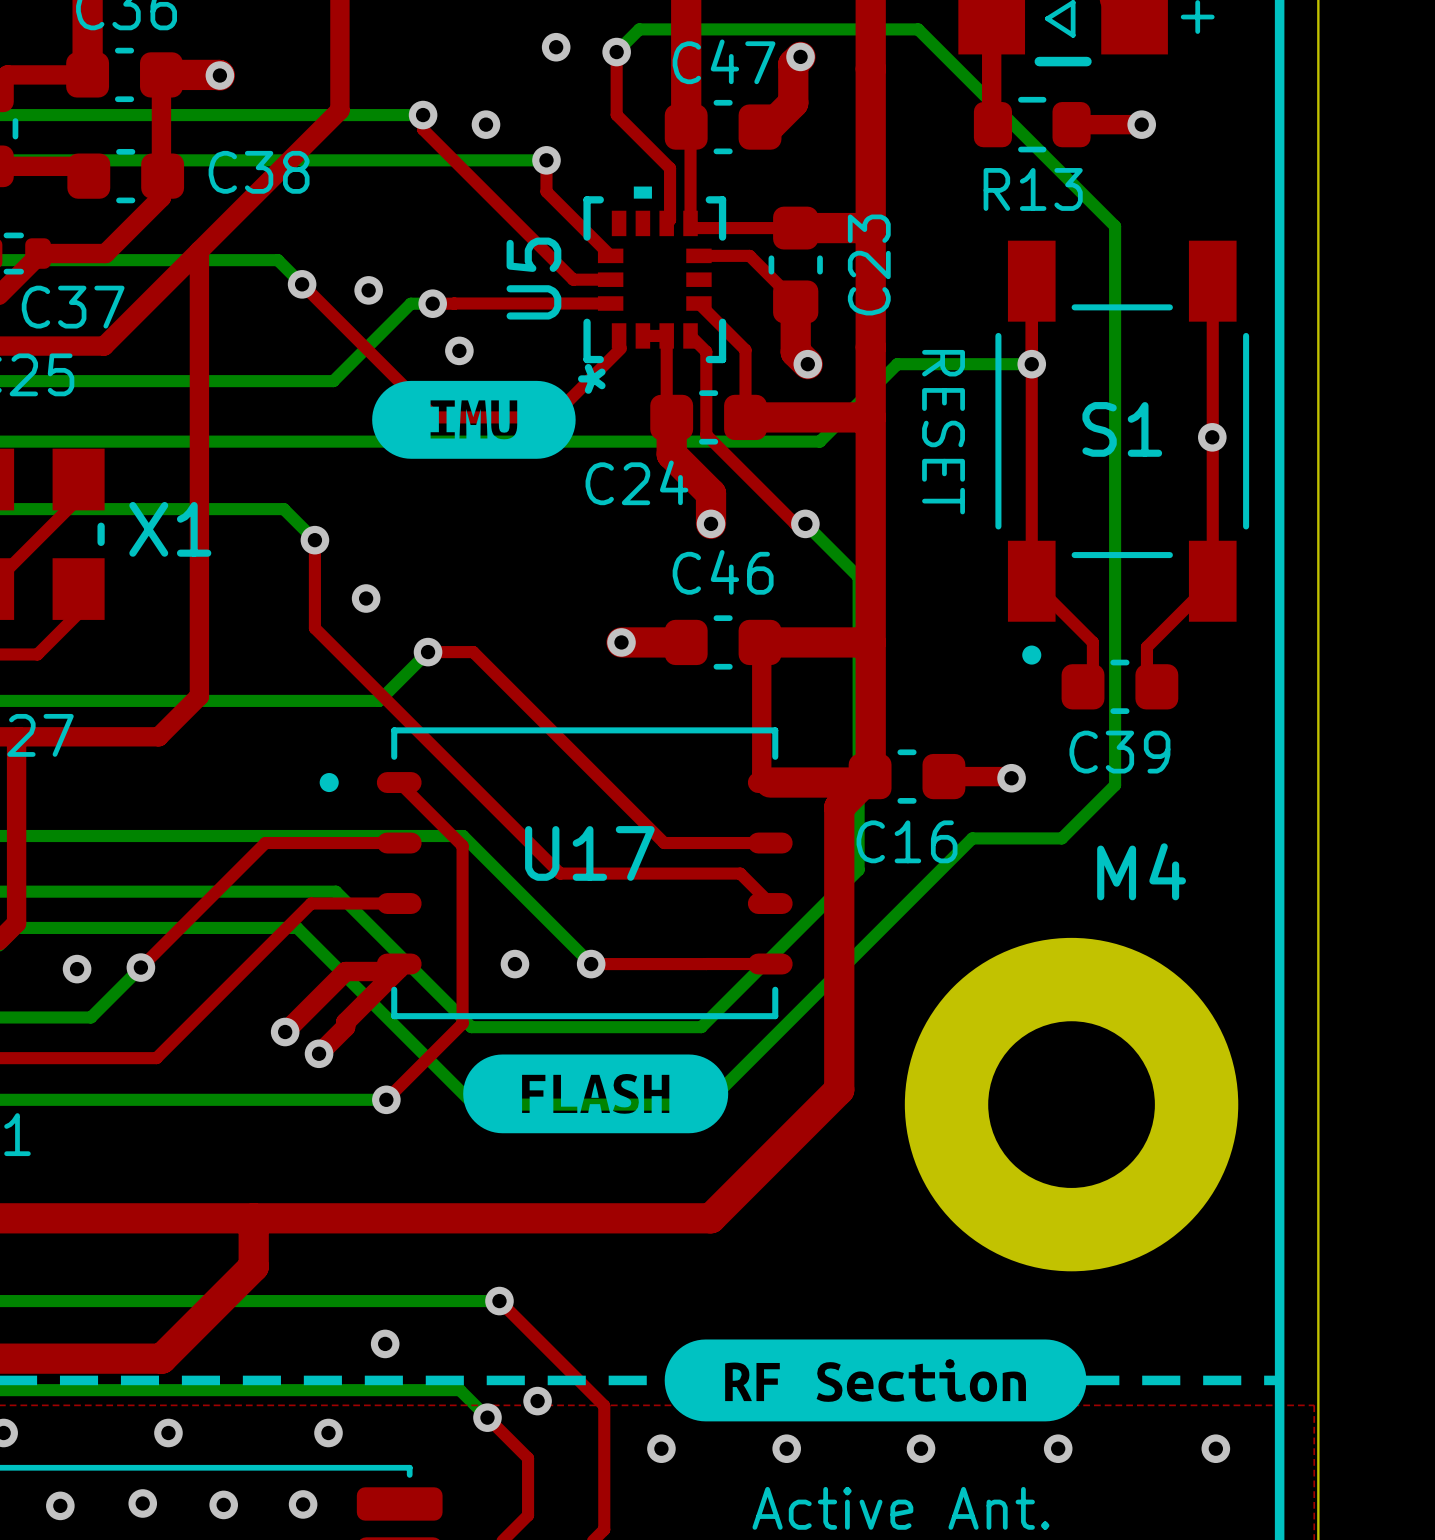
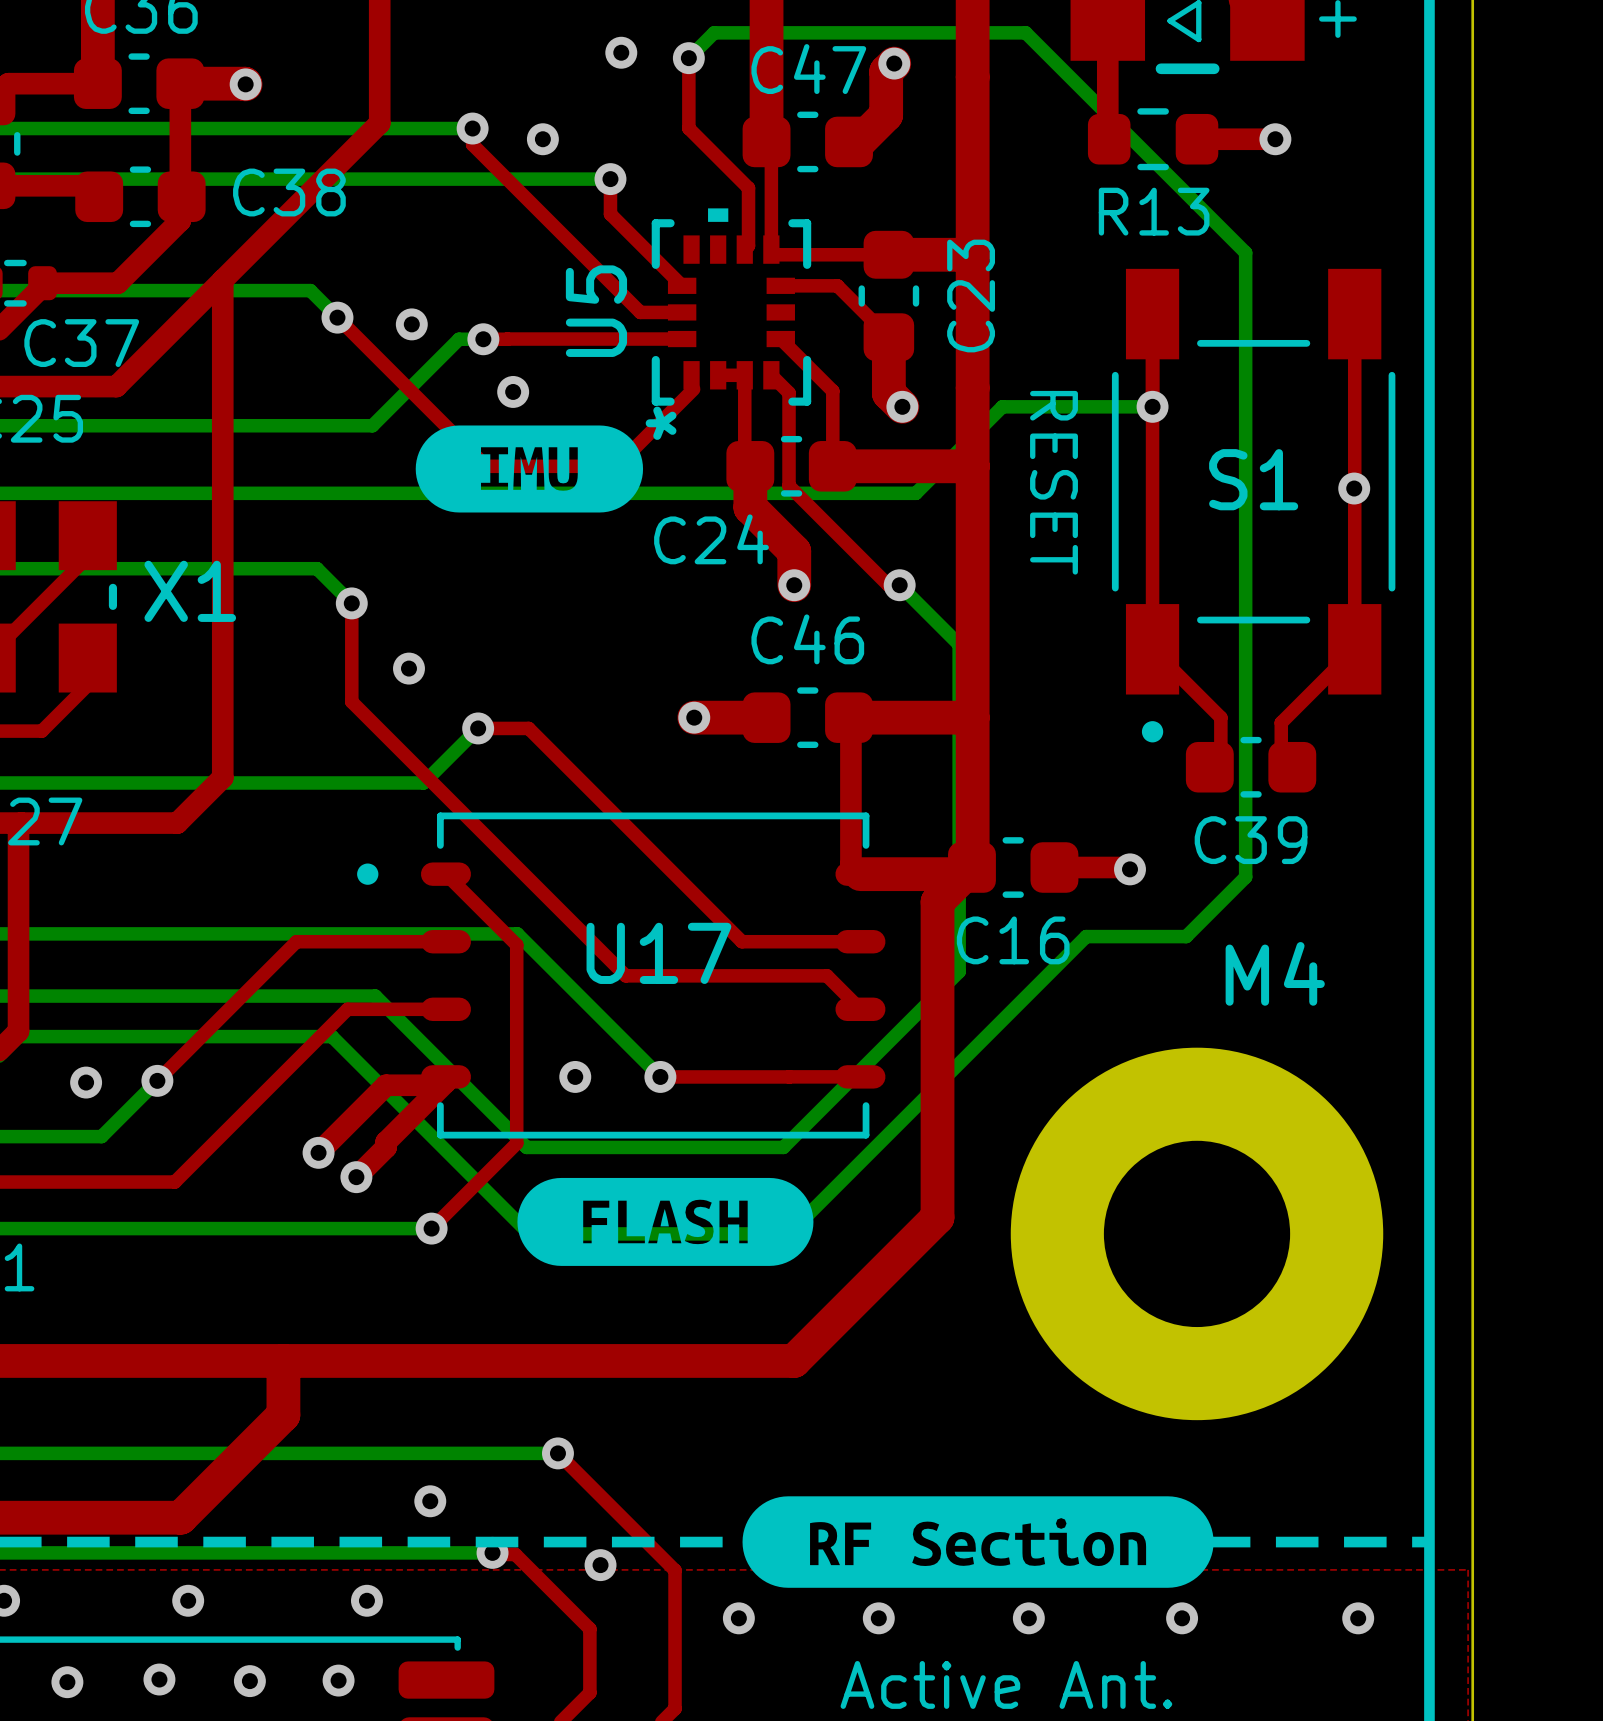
top track: none -> (492, 1552) (515, 1554) (544, 1583)
bottom track: (440, 1390) (459, 1390) (487, 1417) -> none
via position: (487, 1417) -> (492, 1552)

